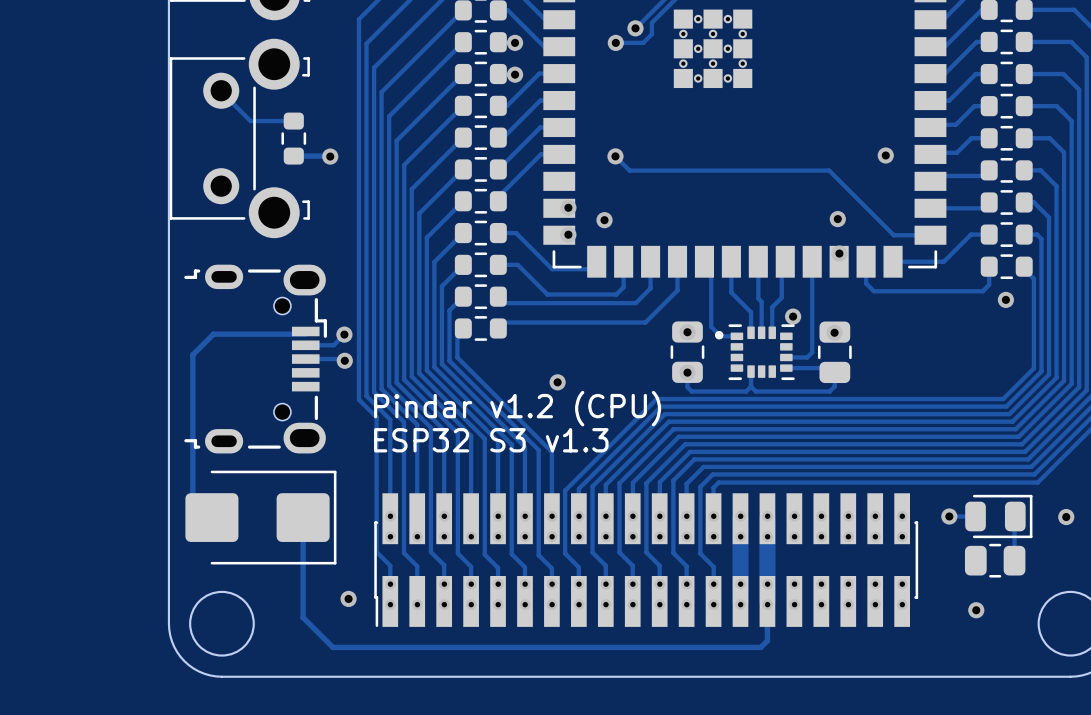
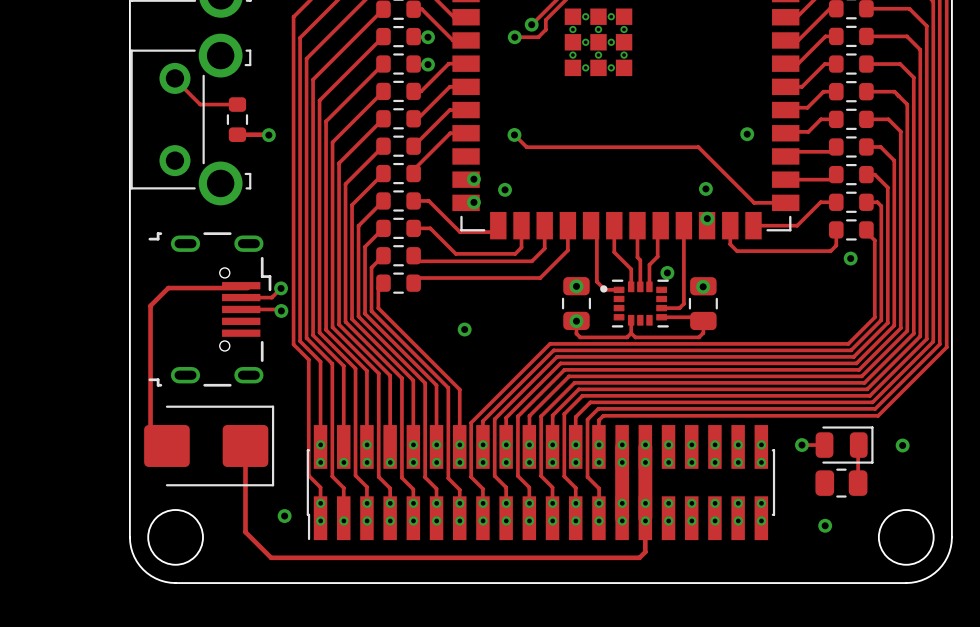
part footprint: [184, 264, 327, 454] -> [148, 232, 272, 387]
text: Pindar v1.2 (CPU) (517, 408) -> none
text: ESP32 S3 v1.3 (491, 440) -> none

